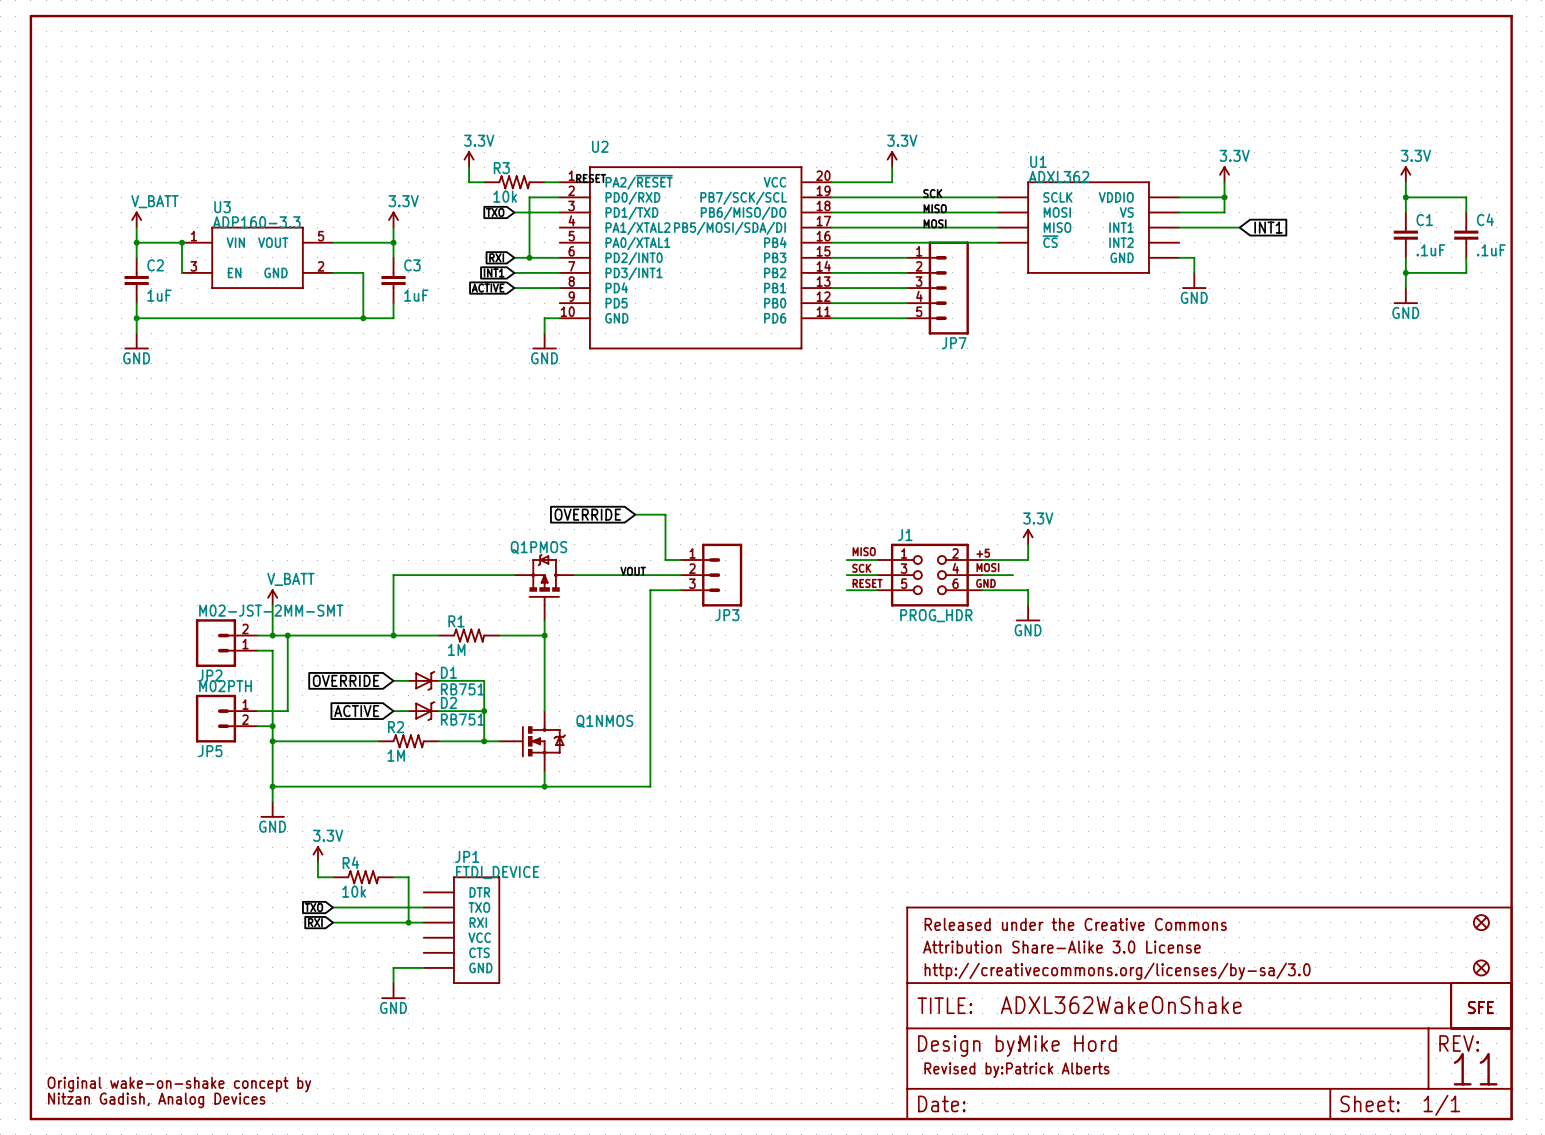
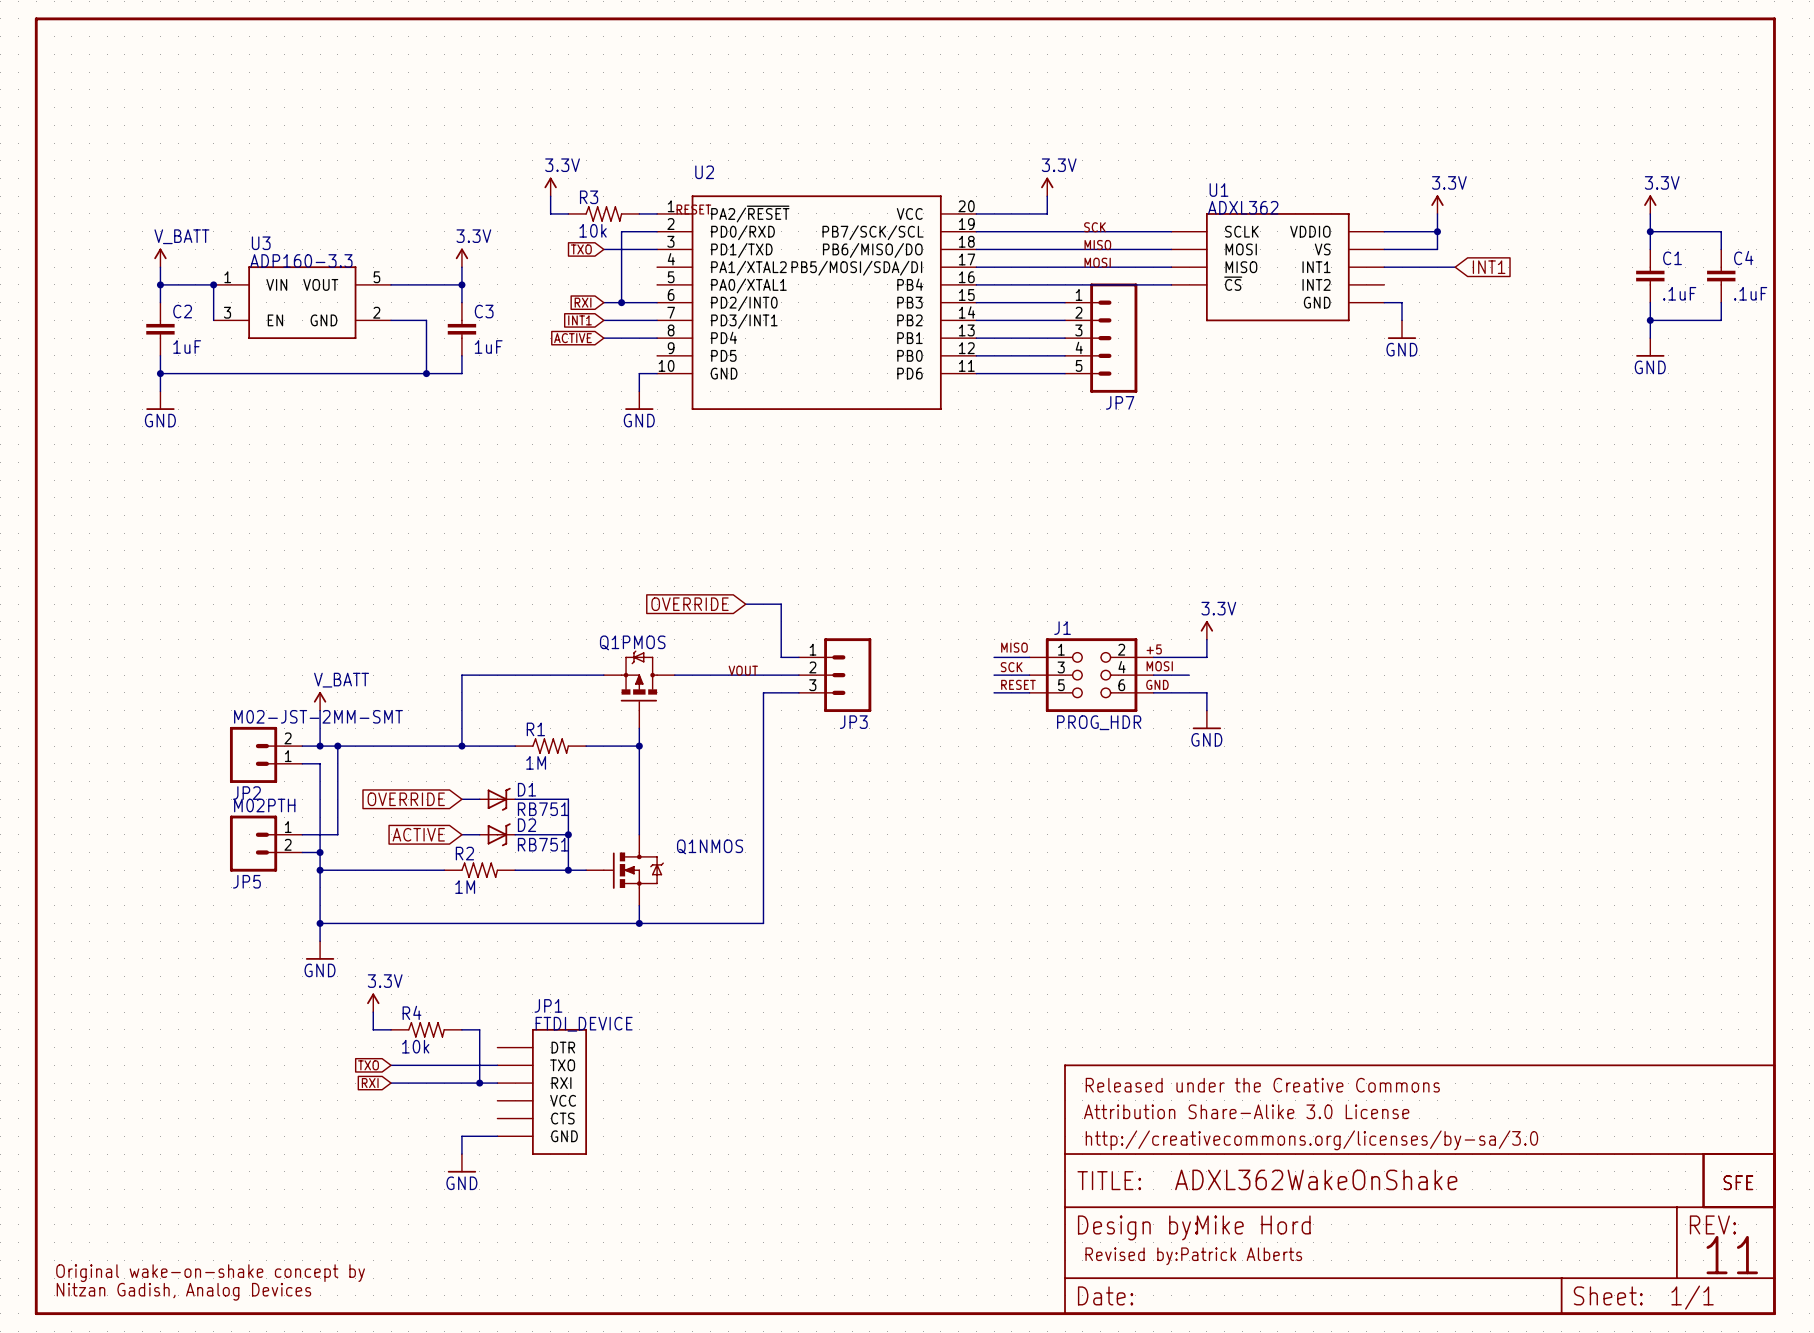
part: (1481, 922) -> none
part: (1481, 967) -> none

